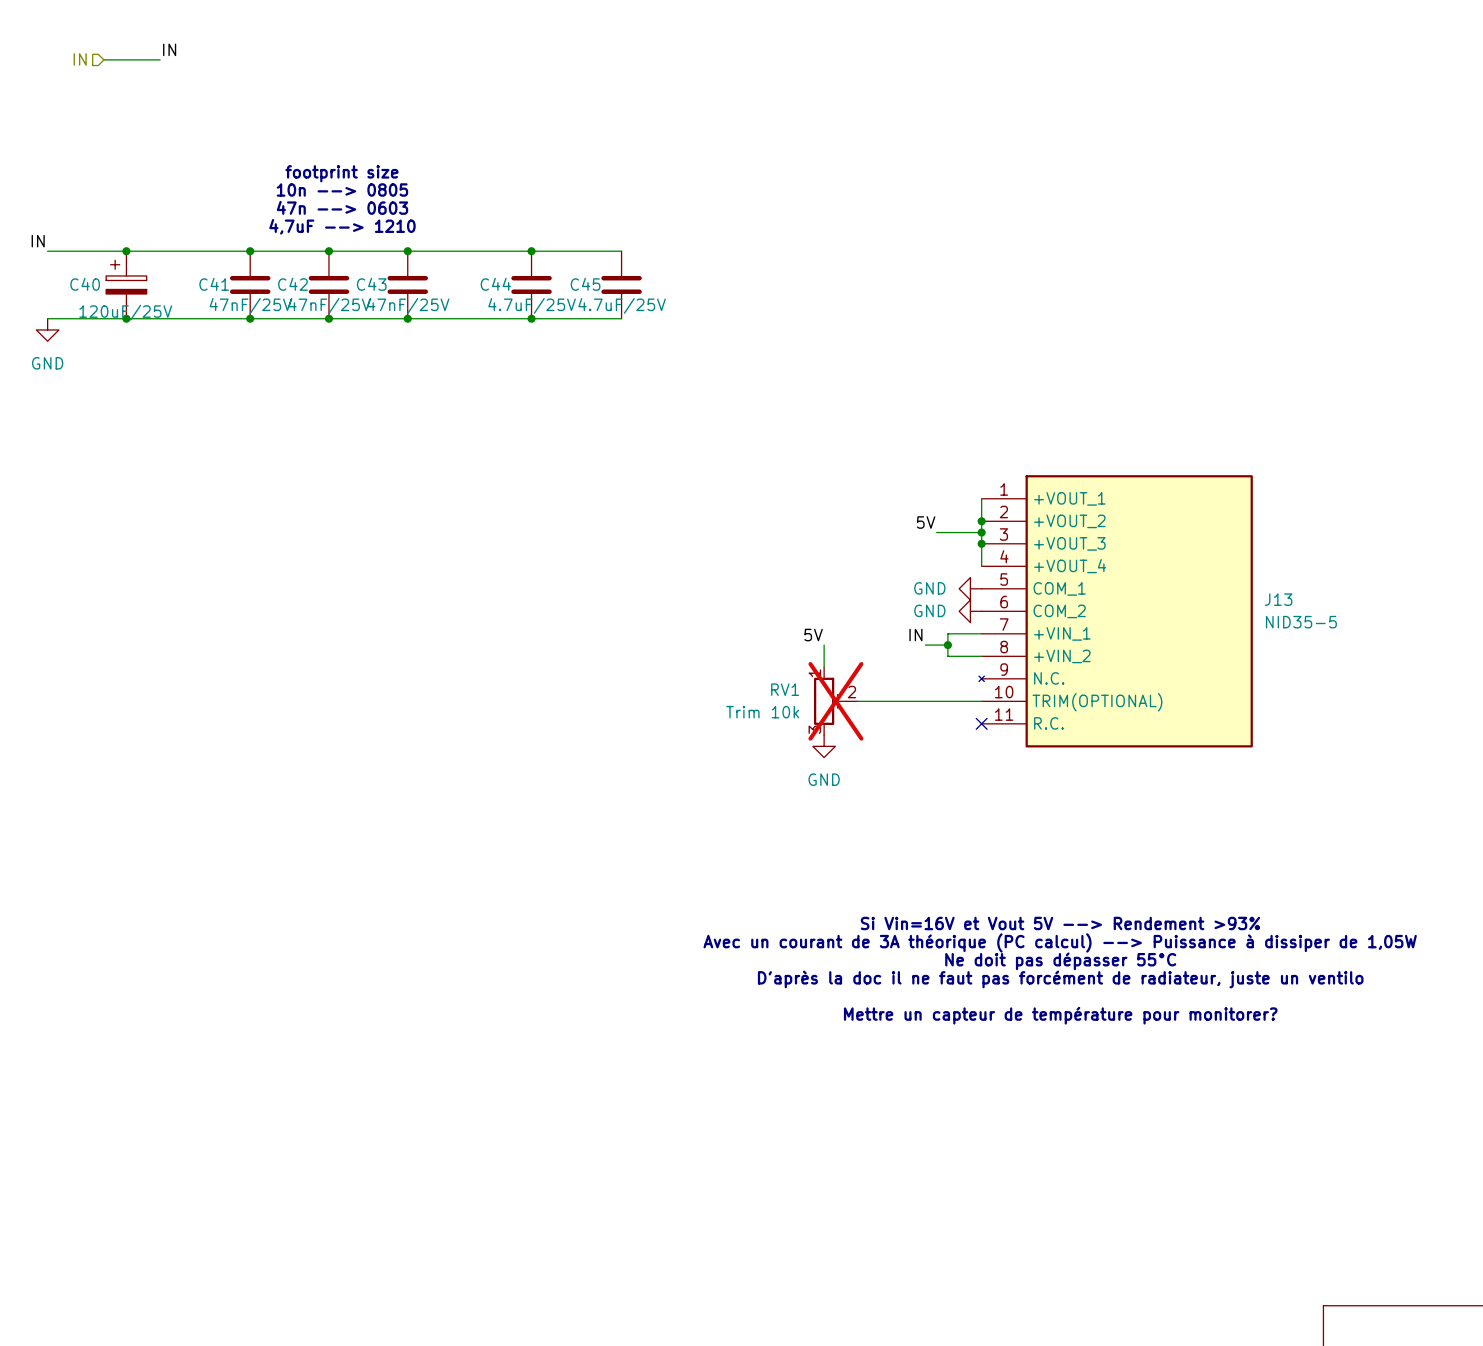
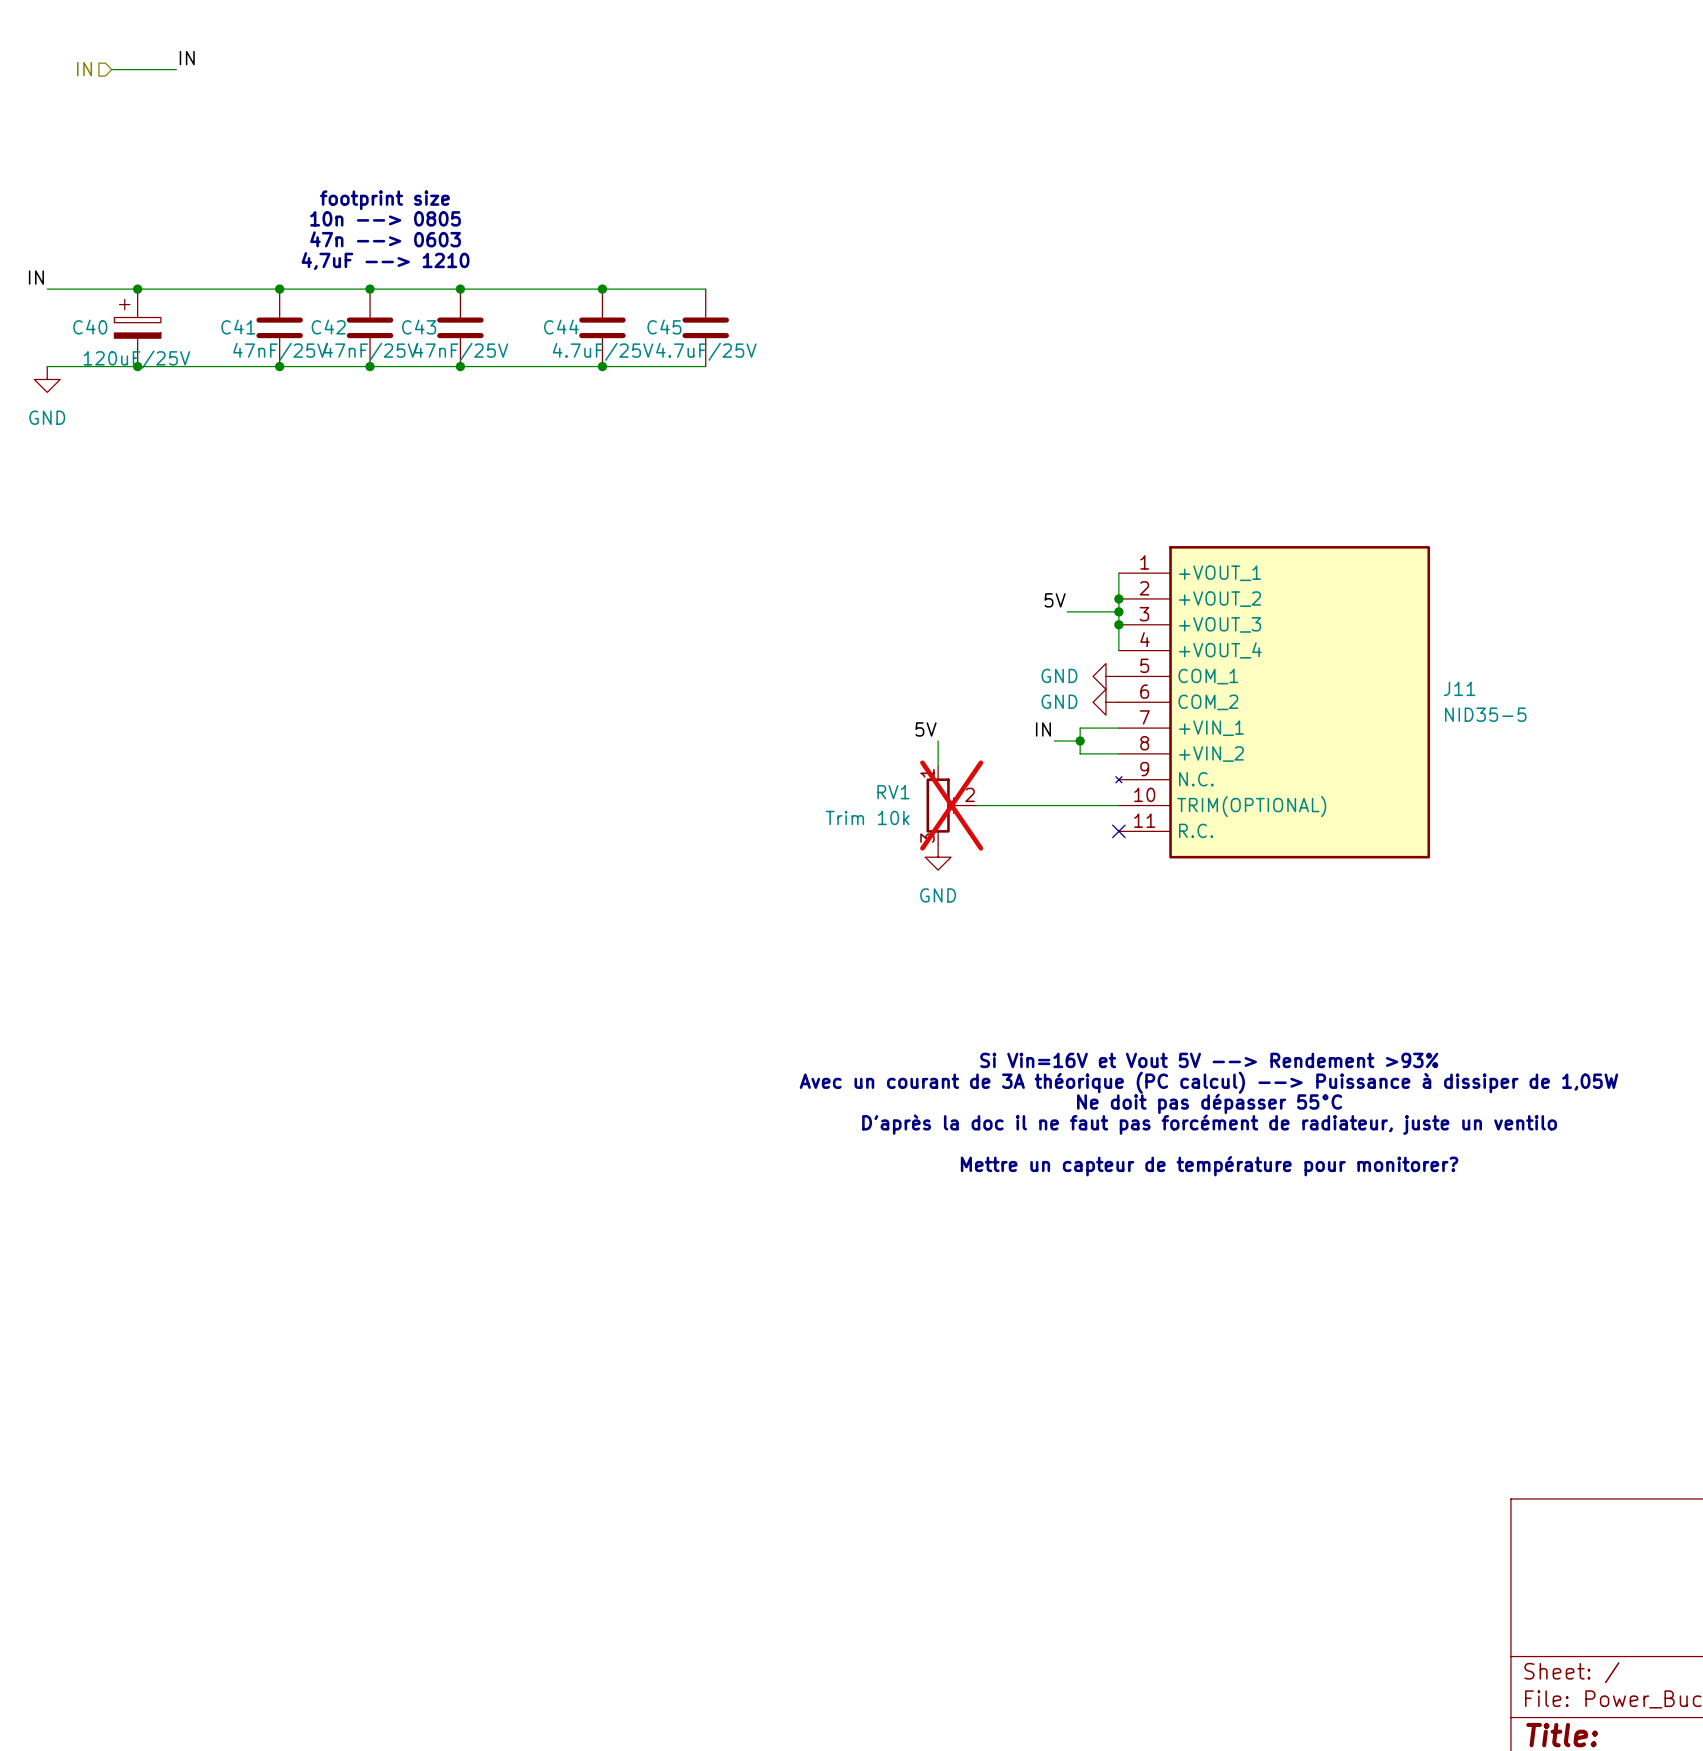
J13 name: J13 (1278, 599) -> J11 (1459, 688)

